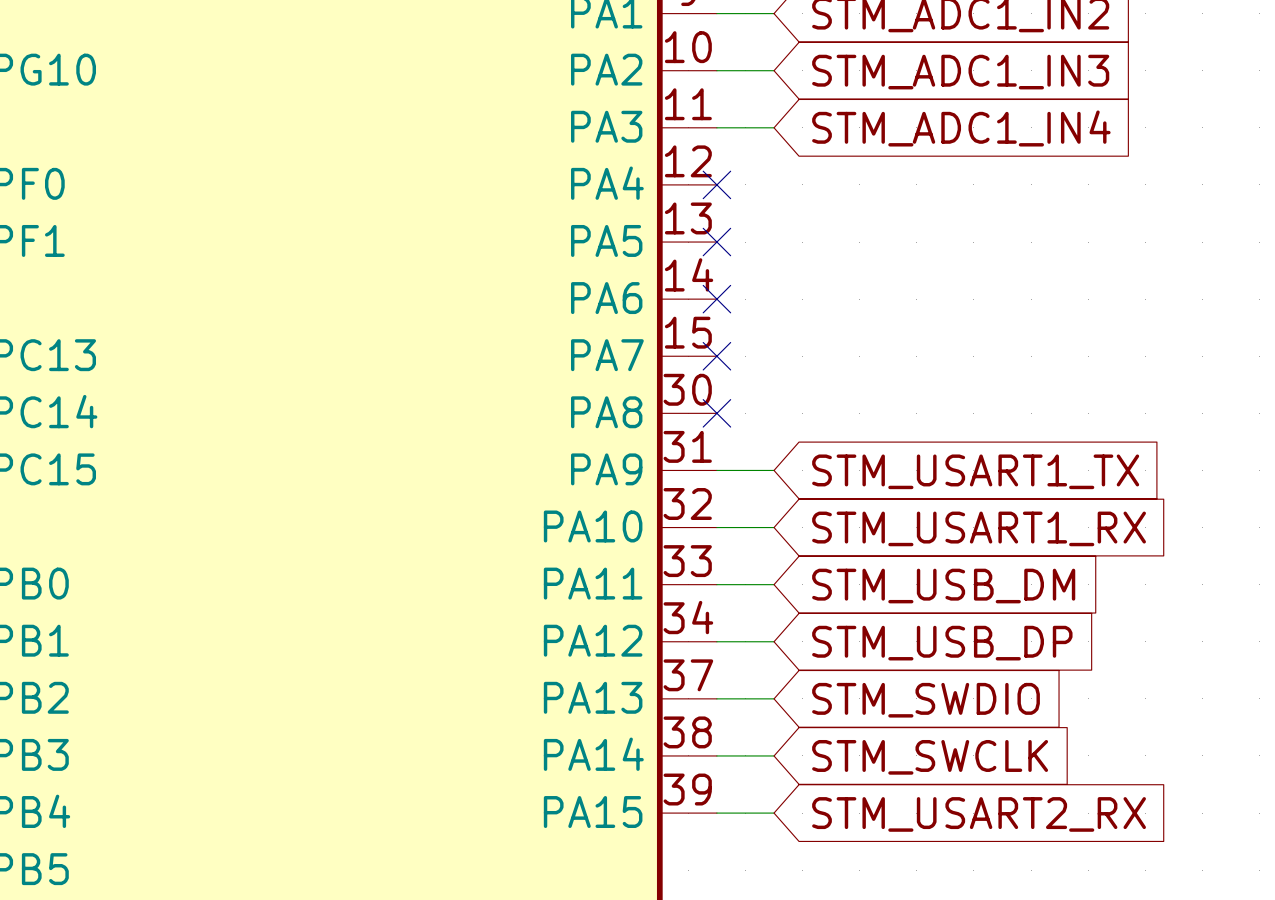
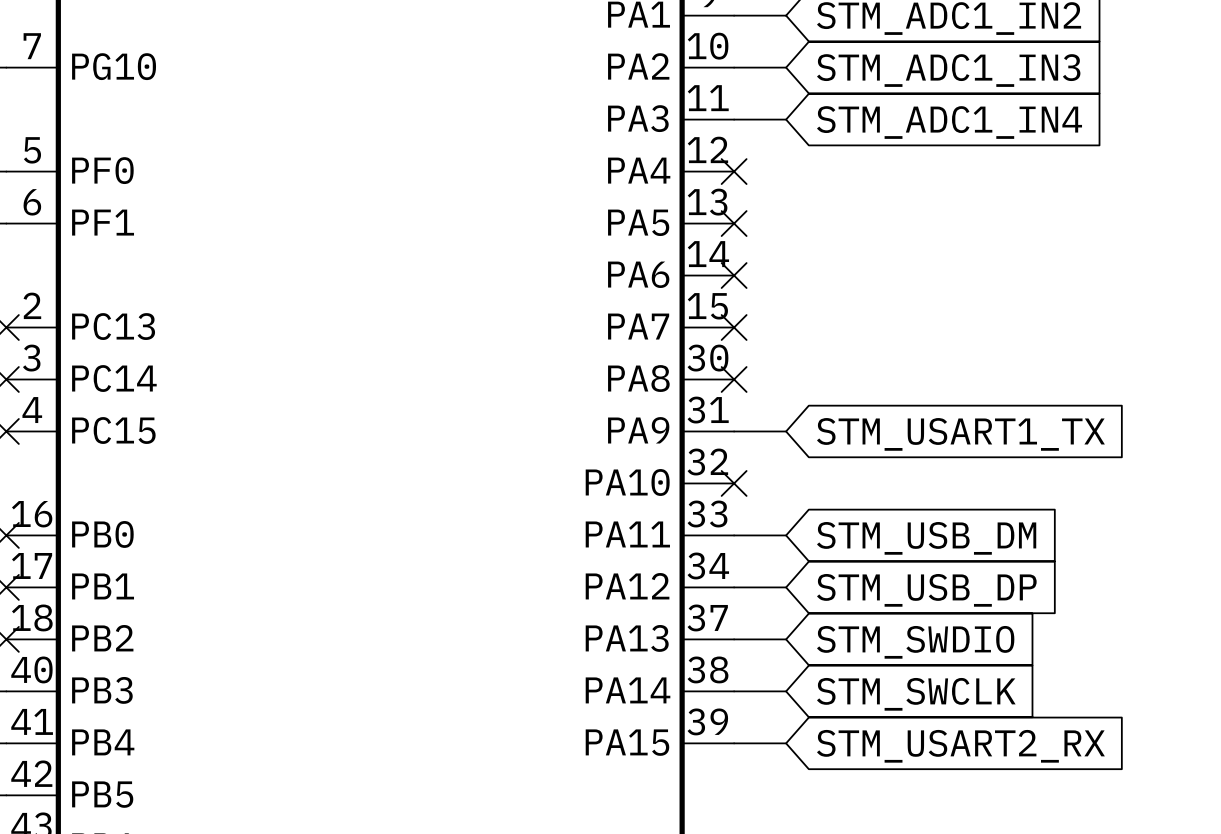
wire: (716, 527) (774, 527) -> none
no-connect mark: none -> (734, 483)
global label: STM_USART1_RX (979, 528) -> none

